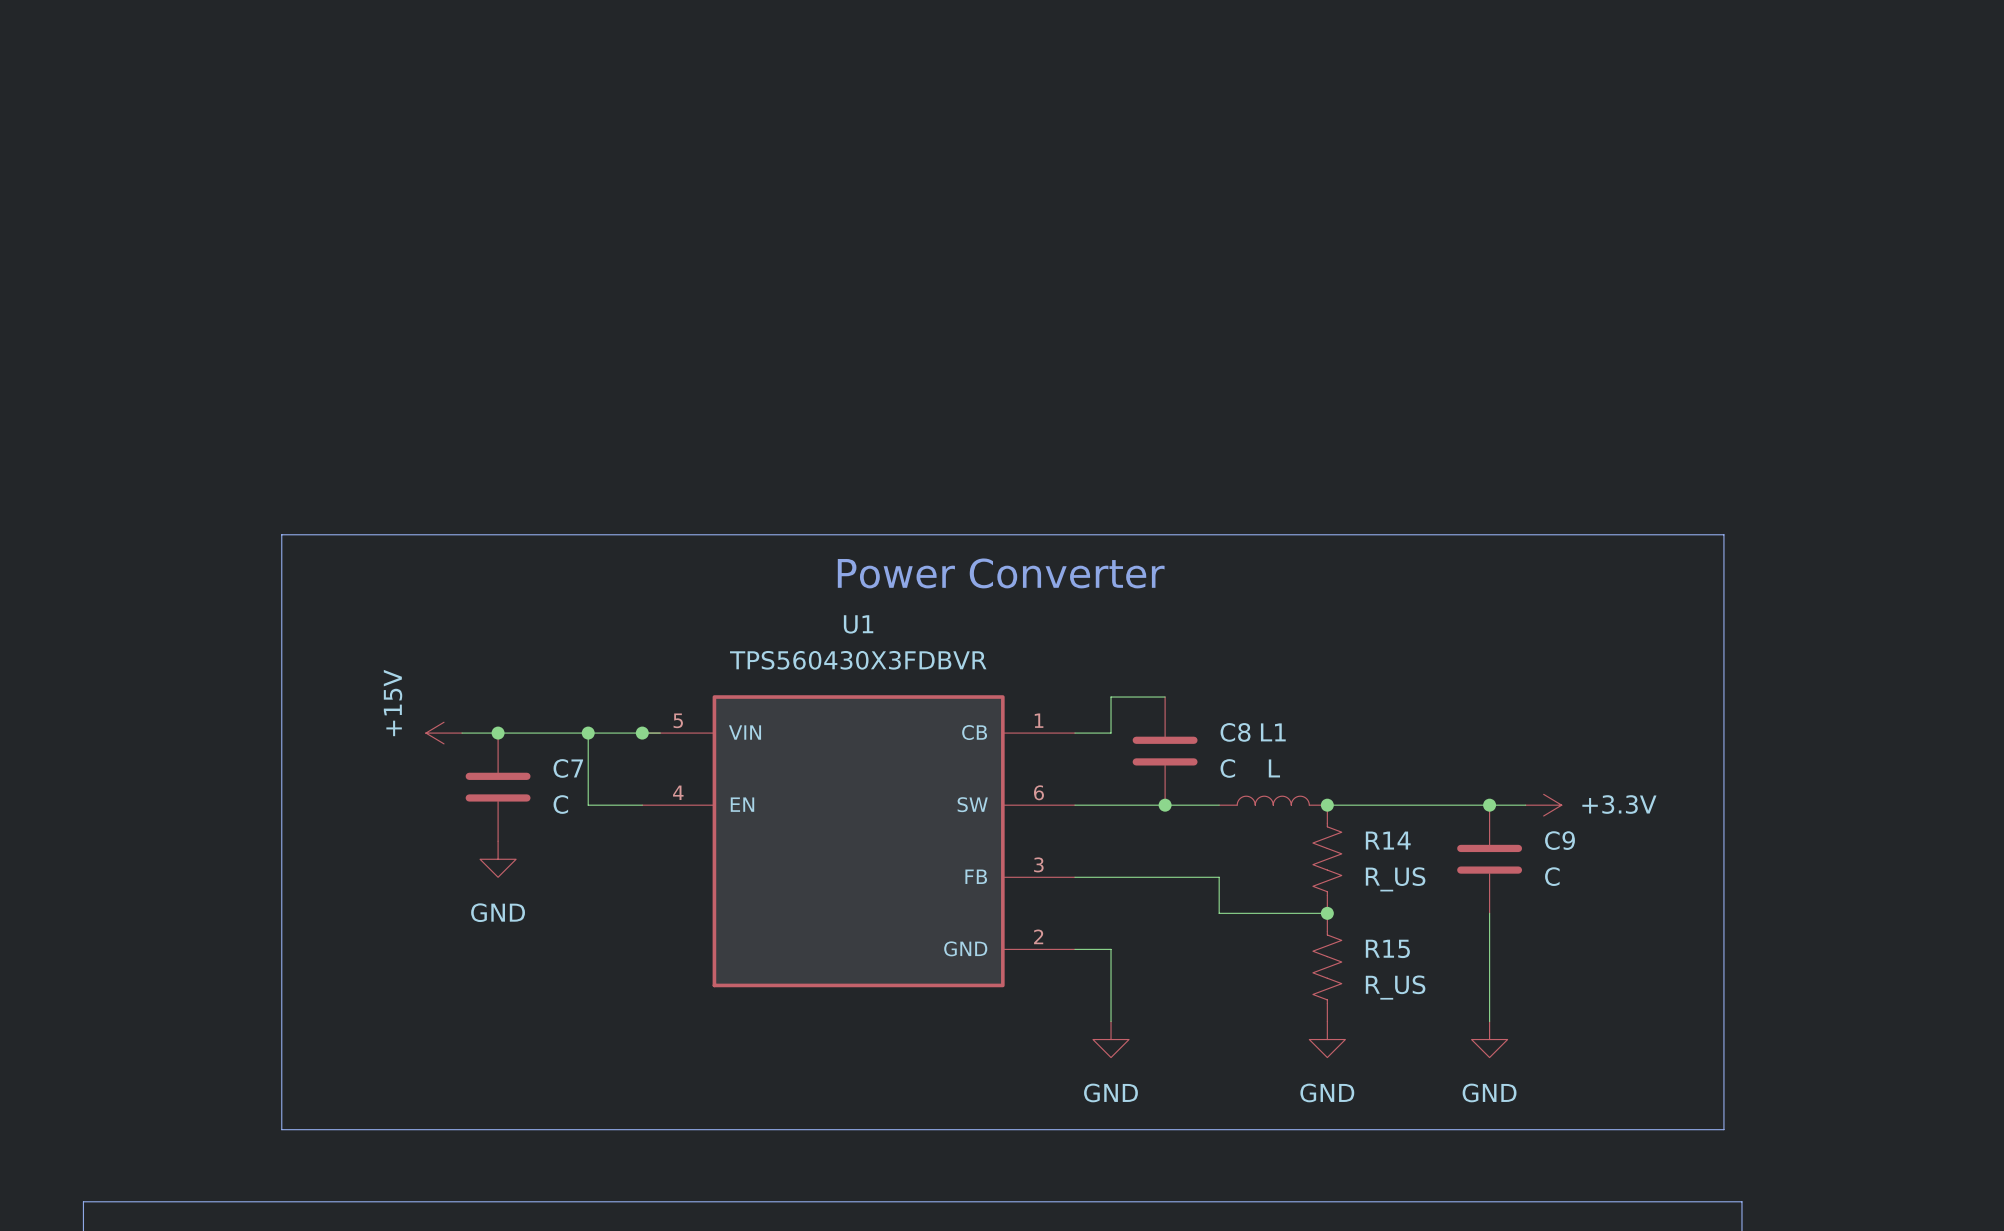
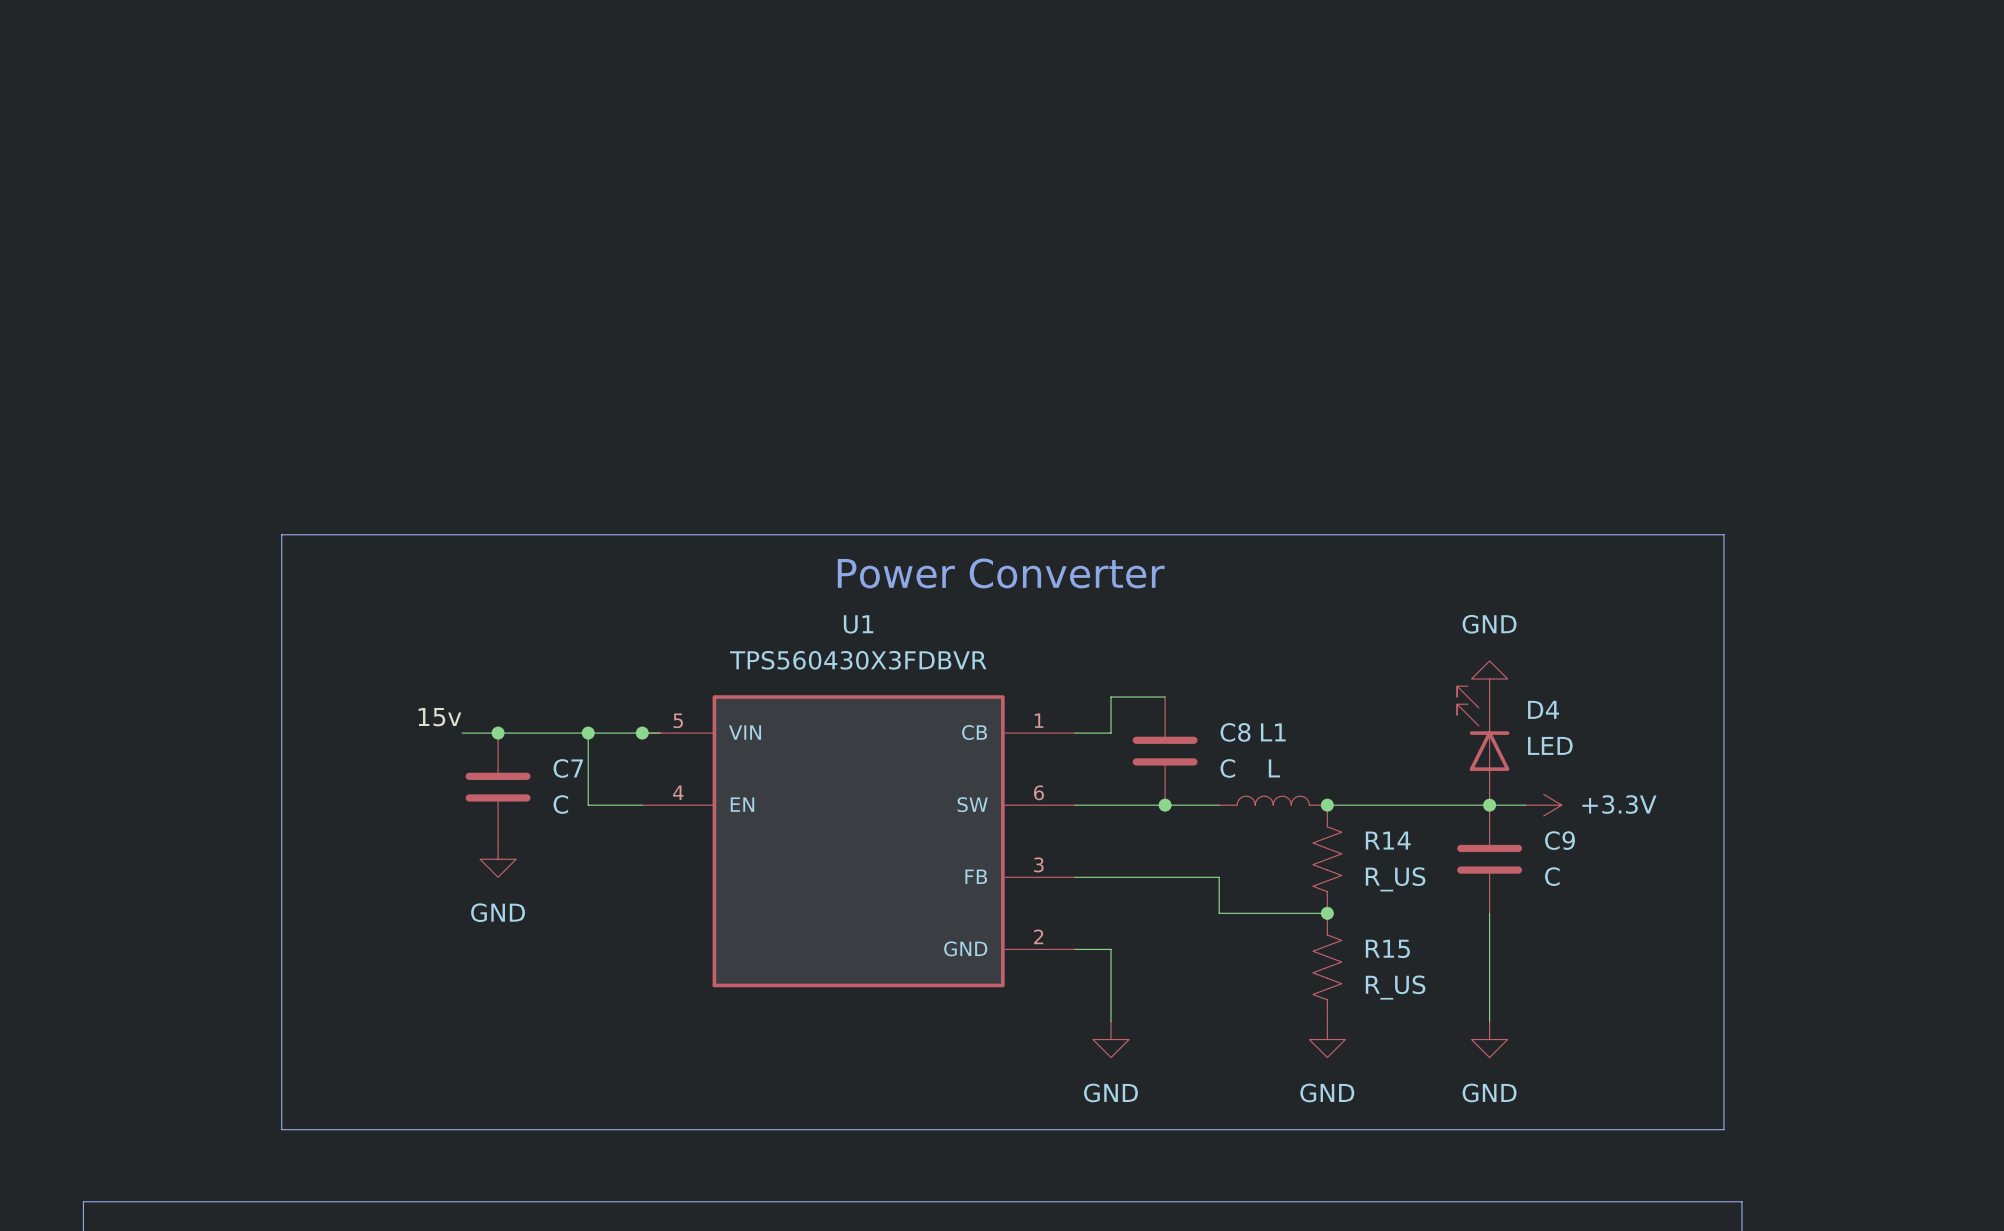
power symbol: none -> GND (1489, 678)
label: none -> 15v (439, 717)
power symbol: +15V (444, 733) -> none
D4: none -> LED (1483, 745)

